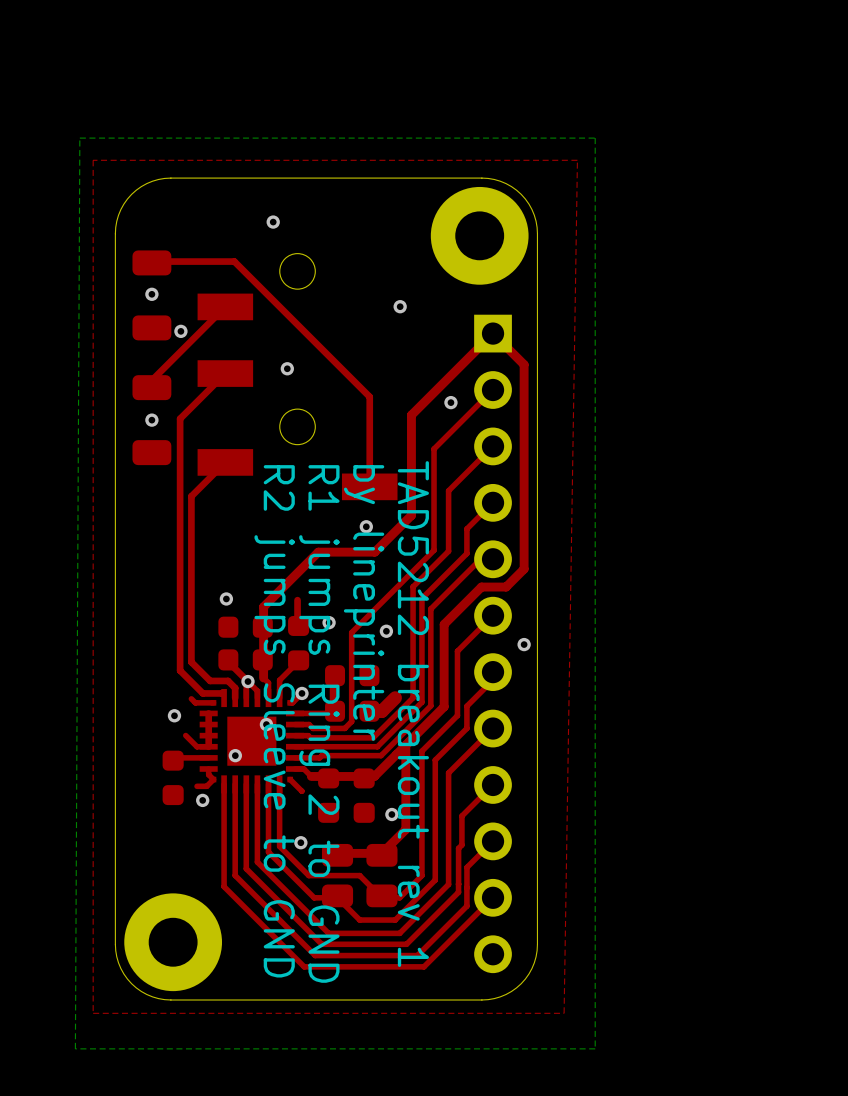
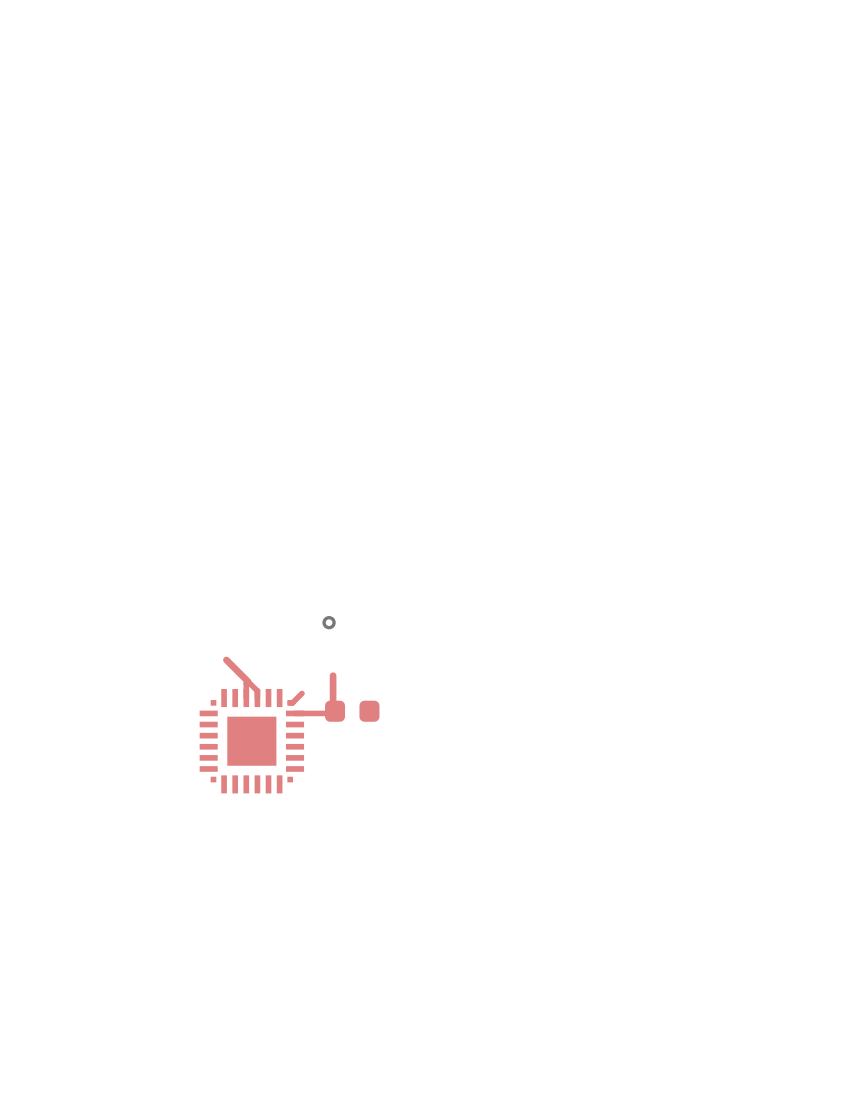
bottom zone outline: (595, 138) (79, 138) (75, 1048) (595, 1048) (595, 138) -> none
top zone outline: (577, 160) (93, 160) (93, 1013) (564, 1013) (577, 160) -> none
board edge: (481, 178) (164, 178) (152, 181) (136, 190) (123, 204) (118, 215) (115, 233) (115, 944) (118, 962) (127, 979) (141, 991) (152, 996) (170, 1000) (488, 999) (500, 996) (516, 987) (528, 974) (534, 962) (537, 944) (537, 227) (531, 209) (516, 190) (500, 181) (481, 178) -> none
via: (273, 222) -> none
part: (479, 235) -> none
top track: (161, 261) (234, 261) (369, 396) (369, 486) -> none
via: (151, 294) -> none
part: (151, 295) -> none
top track: (225, 306) (151, 380) (151, 385) -> none
via: (400, 306) -> none
via: (180, 331) -> none
via: (287, 368) -> none
top track: (225, 373) (180, 418) (180, 670) (202, 693) (222, 693) -> none
part: (297, 376) -> none
top track: (493, 390) (434, 449) (434, 550) (351, 632) (351, 721) (344, 728) (312, 728) (309, 724) (295, 724) -> none
via: (450, 402) -> none
part: (151, 420) -> none
via: (151, 420) -> none
top track: (493, 446) (448, 490) (448, 551) (413, 586) (413, 697) (373, 737) (310, 737) (308, 735) (295, 735) -> none
top track: (225, 462) (191, 496) (191, 662) (210, 680) (228, 680) (235, 688) (235, 698) -> none
top track: (493, 502) (466, 528) (466, 553) (421, 598) (421, 702) (377, 746) (295, 746) -> none
via: (366, 526) -> none
top track: (493, 559) (480, 559) (430, 609) (430, 705) (381, 755) (321, 755) (319, 757) (295, 757) -> none
via: (226, 598) -> none
top track: (297, 600) (297, 624) -> none
text: by lineprinter (364, 602) -> none
top track: (493, 615) (457, 651) (457, 715) (421, 751) (421, 875) (399, 897) (381, 897) (359, 875) (308, 875) (279, 846) (279, 784) -> none
part: (245, 627) -> none
via: (386, 631) -> none
part: (298, 643) -> none
part: (493, 643) -> none
via: (524, 644) -> none
part: (245, 659) -> none
top track: (297, 662) (279, 680) (279, 698) -> none
top track: (493, 672) (493, 680) (466, 706) (466, 728) (435, 760) (435, 880) (395, 920) (359, 920) (337, 897) (314, 897) (268, 852) (268, 784) -> none
part: (352, 675) -> none
via: (247, 681) -> none
via: (301, 693) -> none
top track: (395, 697) (381, 711) (371, 711) -> none
top track: (191, 698) (195, 702) (213, 702) -> none
top track: (268, 698) (268, 682) (263, 677) (263, 606) (318, 552) (374, 552) (411, 515) (411, 415) (493, 333) (524, 364) (524, 569) (506, 587) (481, 587) (444, 624) (444, 706) (374, 776) (311, 776) (303, 768) (295, 768) -> none
top track: (208, 713) (208, 746) (197, 746) (185, 735) -> none
text: TAD5212 breakout rev 1 (413, 714) -> none
via: (174, 715) -> none
text: R2 jumps Sleeve to GND (274, 721) -> none
text: R1 jumps Ring 2 to GND (319, 723) -> none
via: (266, 724) -> none
top track: (493, 728) (448, 772) (448, 884) (399, 933) (328, 933) (257, 862) (257, 784) -> none
top track: (405, 745) (405, 829) (381, 853) (337, 853) -> none
via: (235, 755) -> none
top track: (208, 757) (173, 758) -> none
top track: (208, 768) (208, 774) (213, 779) (206, 786) (197, 786) -> none
part: (173, 777) -> none
top track: (290, 779) (301, 791) -> none
top track: (224, 784) (224, 886) (304, 966) (423, 966) (493, 897) (493, 906) -> none
top track: (235, 784) (235, 875) (315, 955) (417, 955) (466, 906) (466, 887) -> none
top track: (246, 784) (246, 868) (321, 944) (406, 944) (458, 892) (458, 848) (461, 845) (461, 816) (493, 784) -> none
part: (328, 795) -> none
part: (364, 795) -> none
via: (202, 800) -> none
via: (391, 814) -> none
top track: (493, 841) (466, 867) (466, 887) -> none
via: (300, 842) -> none
part: (337, 875) -> none
part: (381, 875) -> none
part: (173, 942) -> none

